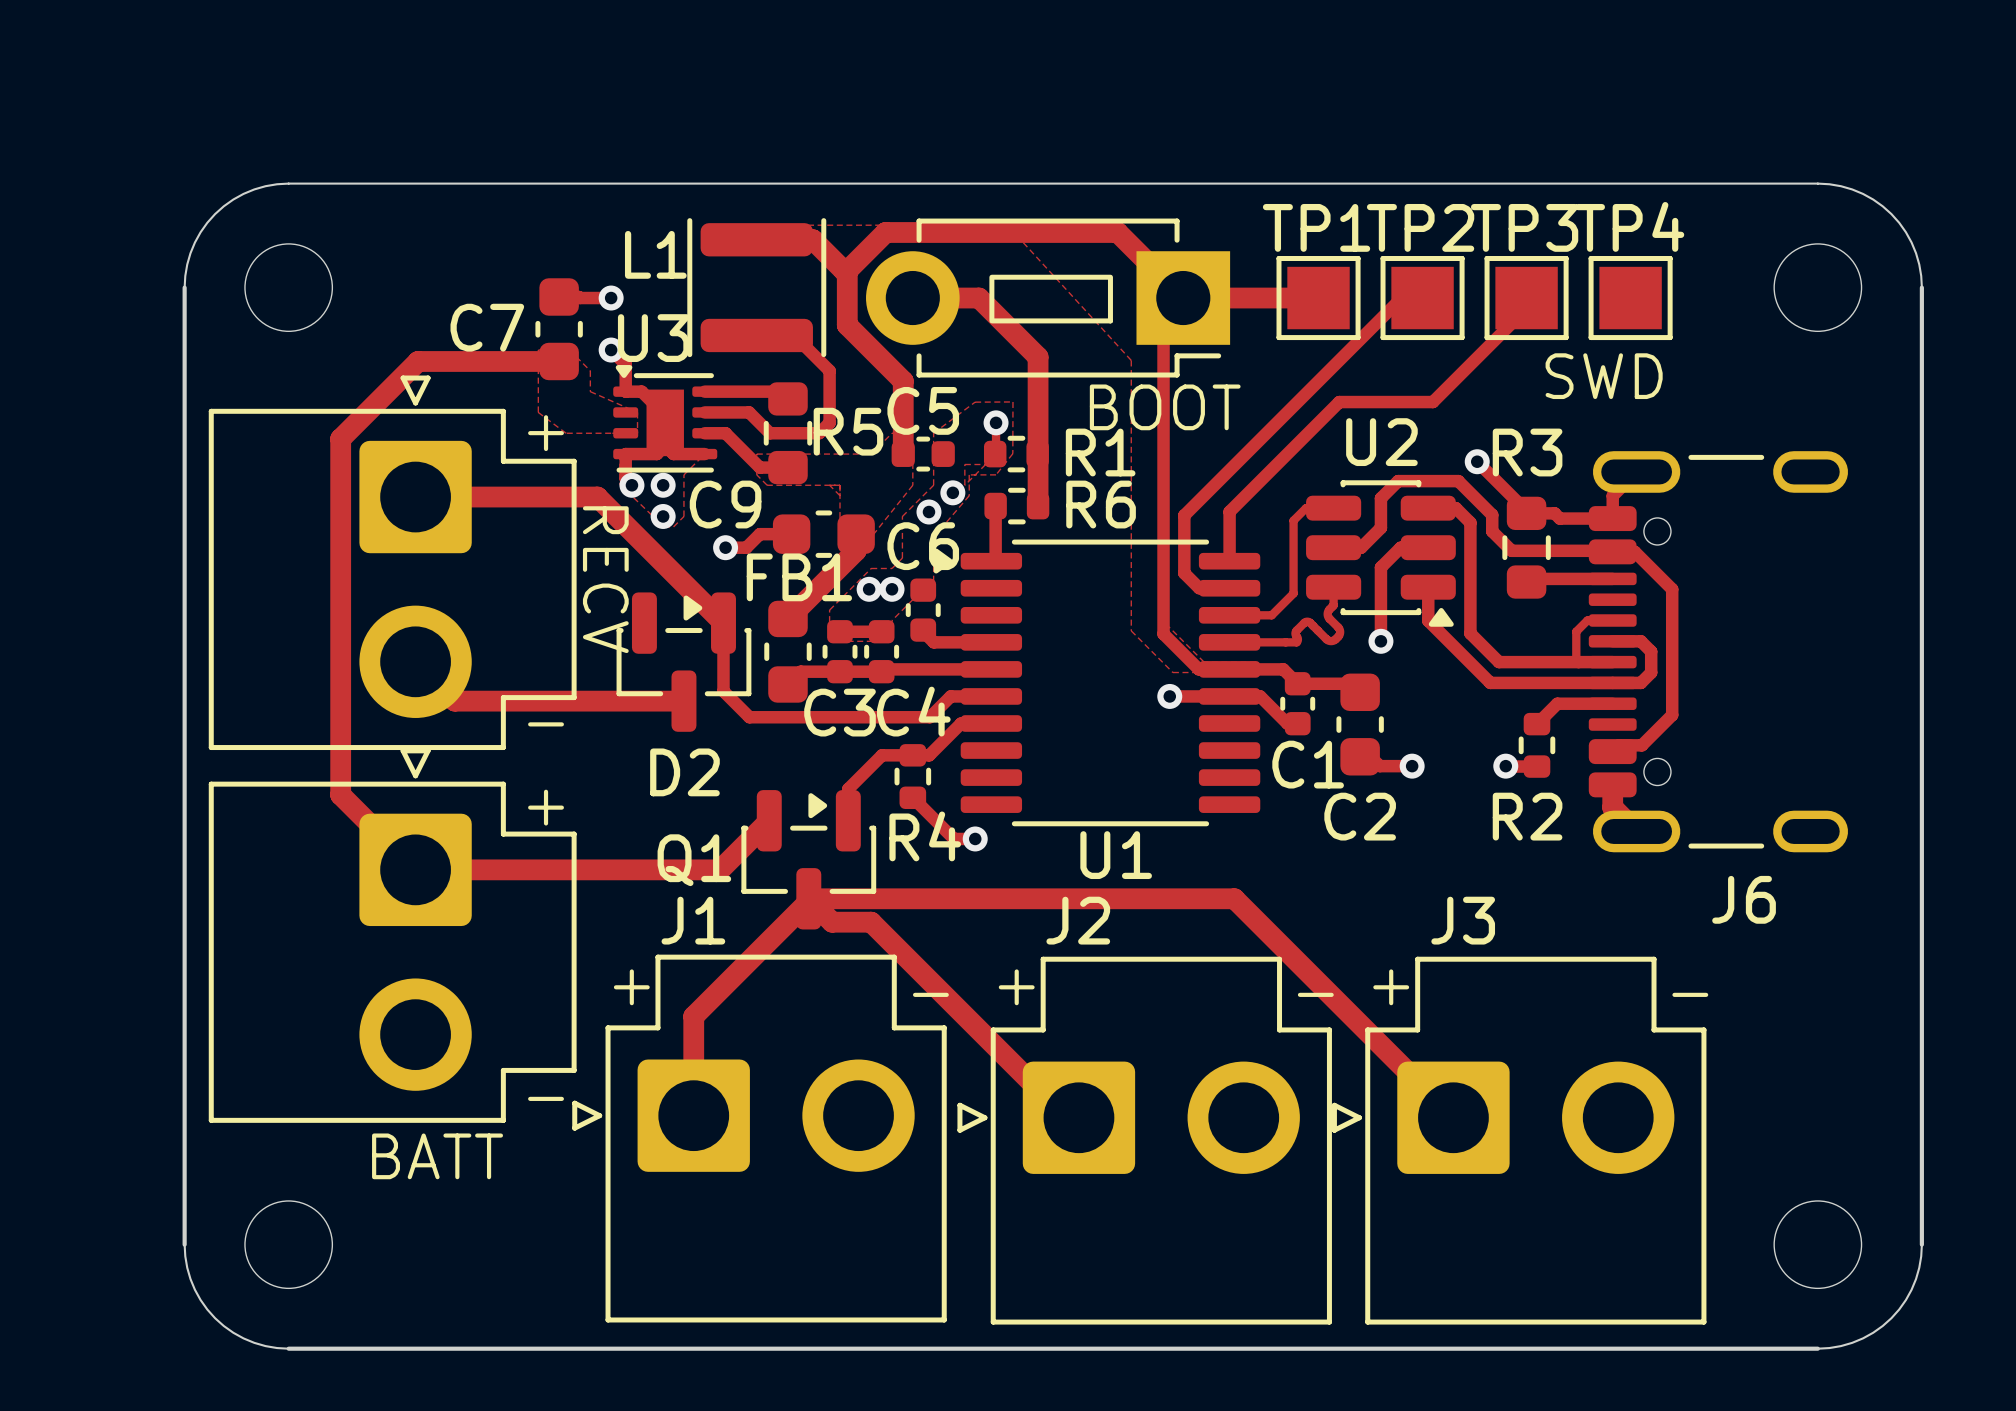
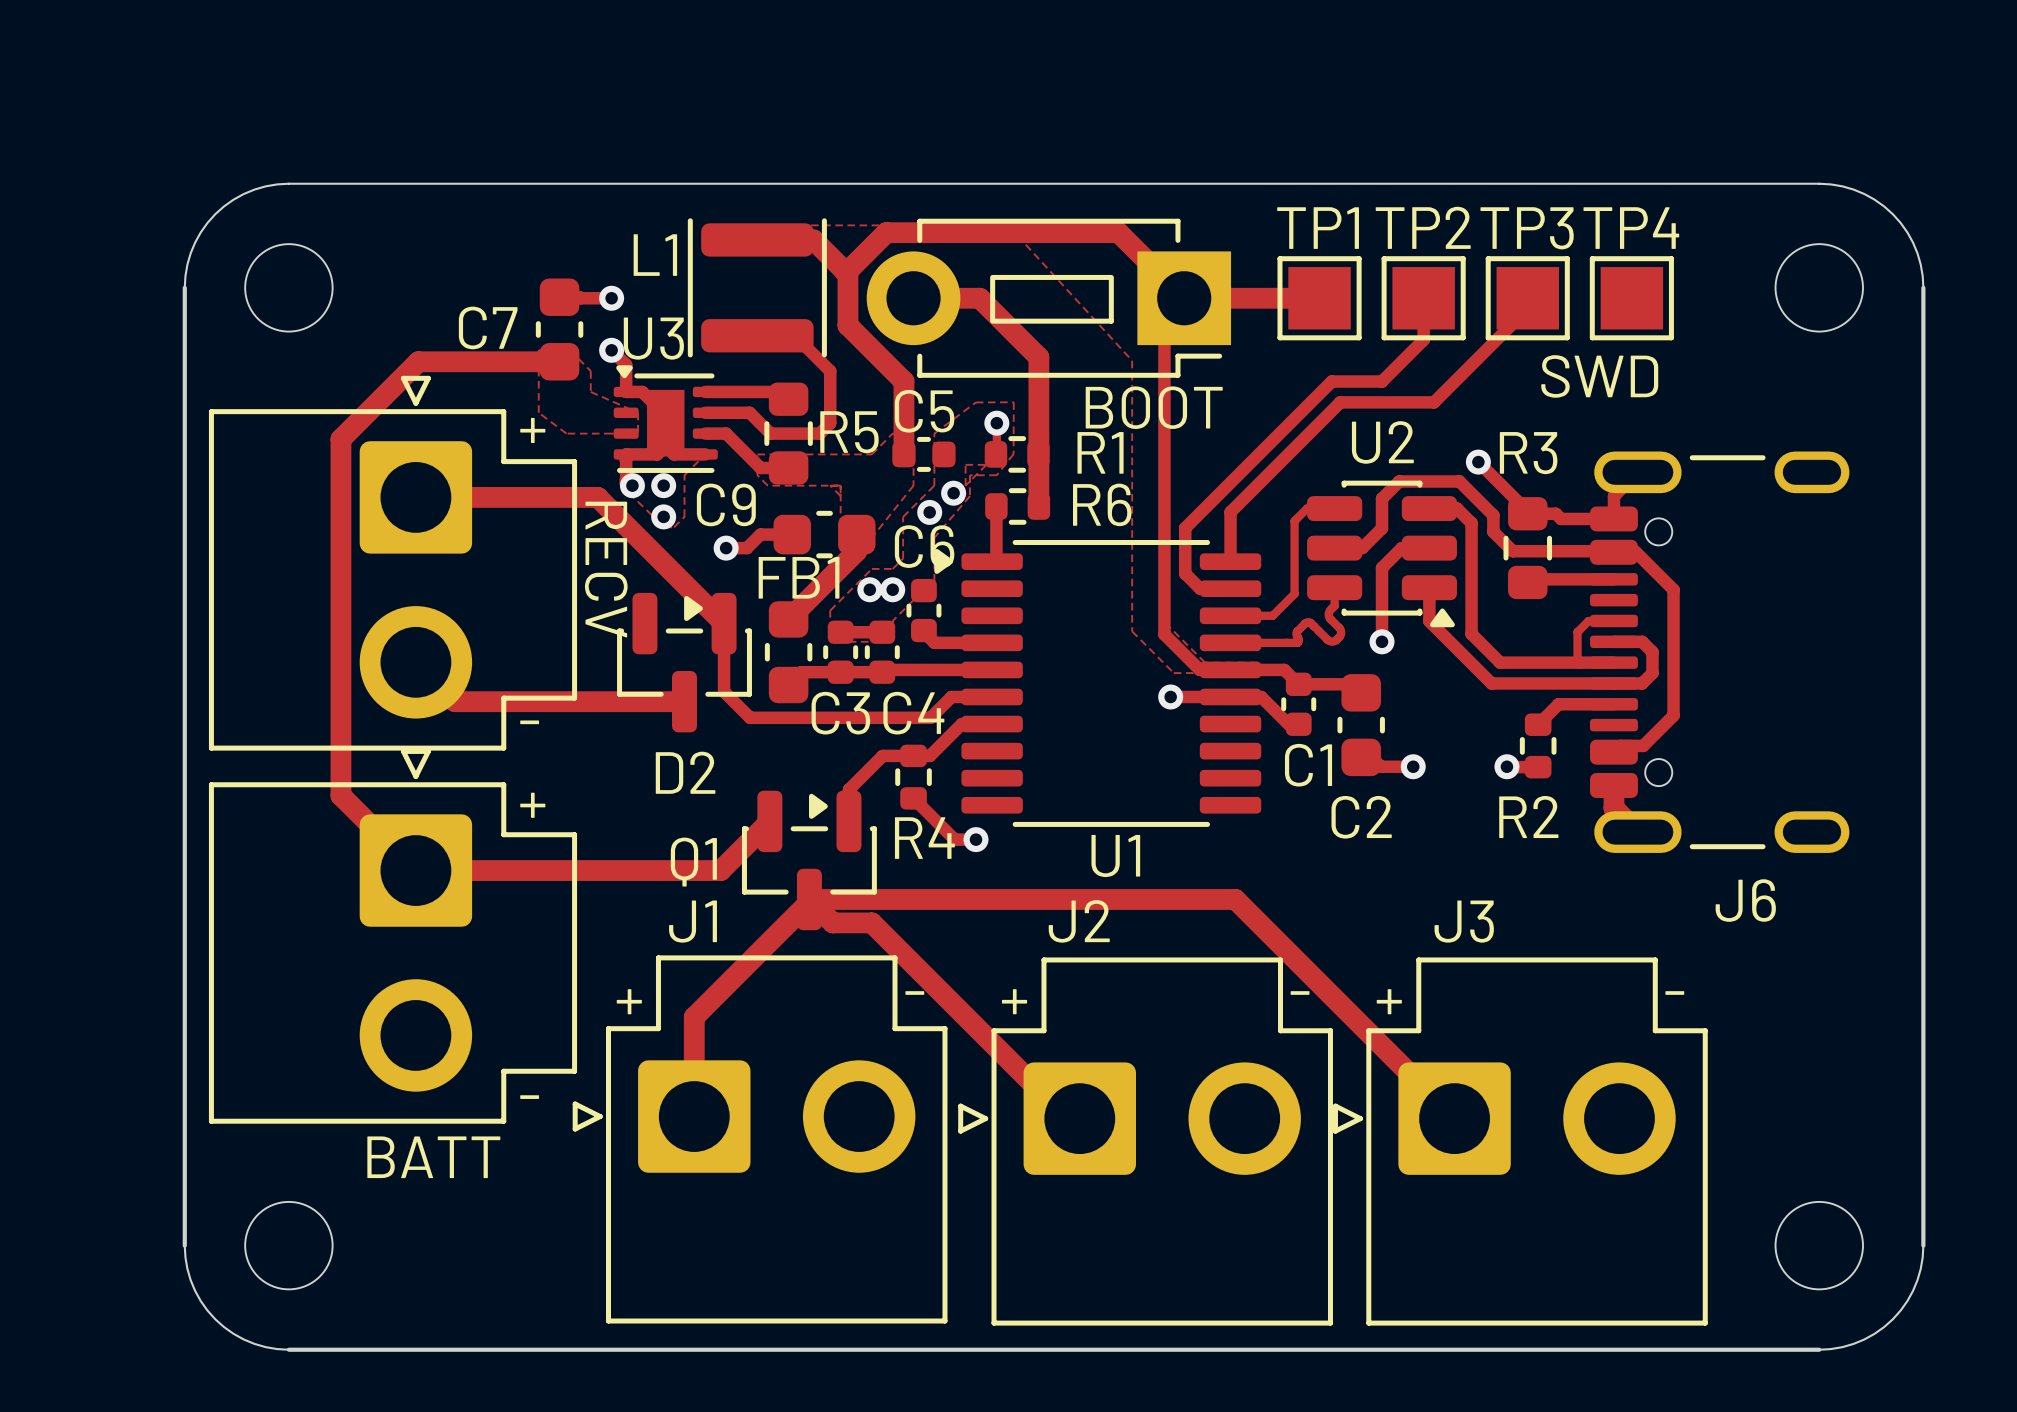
track: (1422, 298) (1401, 298) (1184, 515) (1184, 527) -> (1423, 298) (1423, 339) (1382, 381) (1331, 381) (1185, 528)

